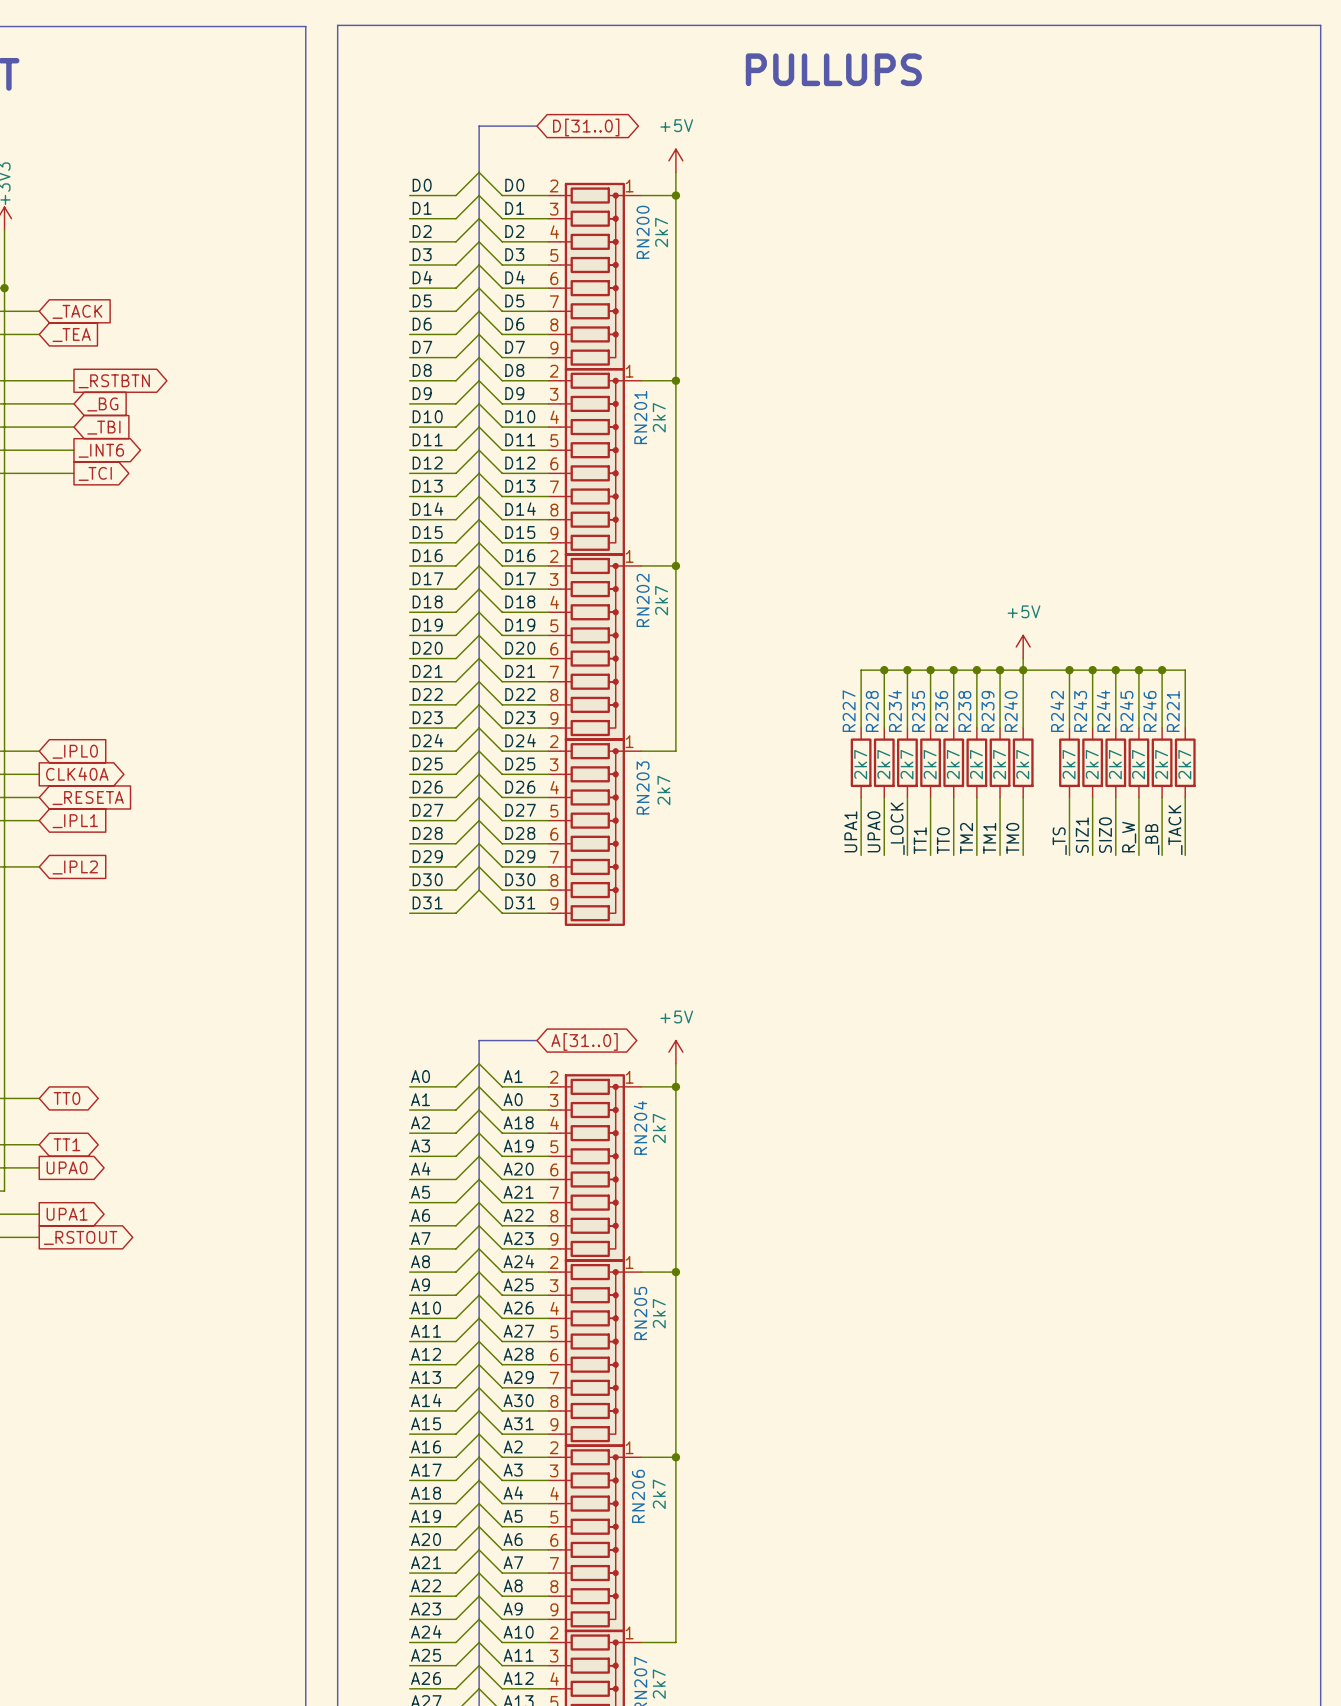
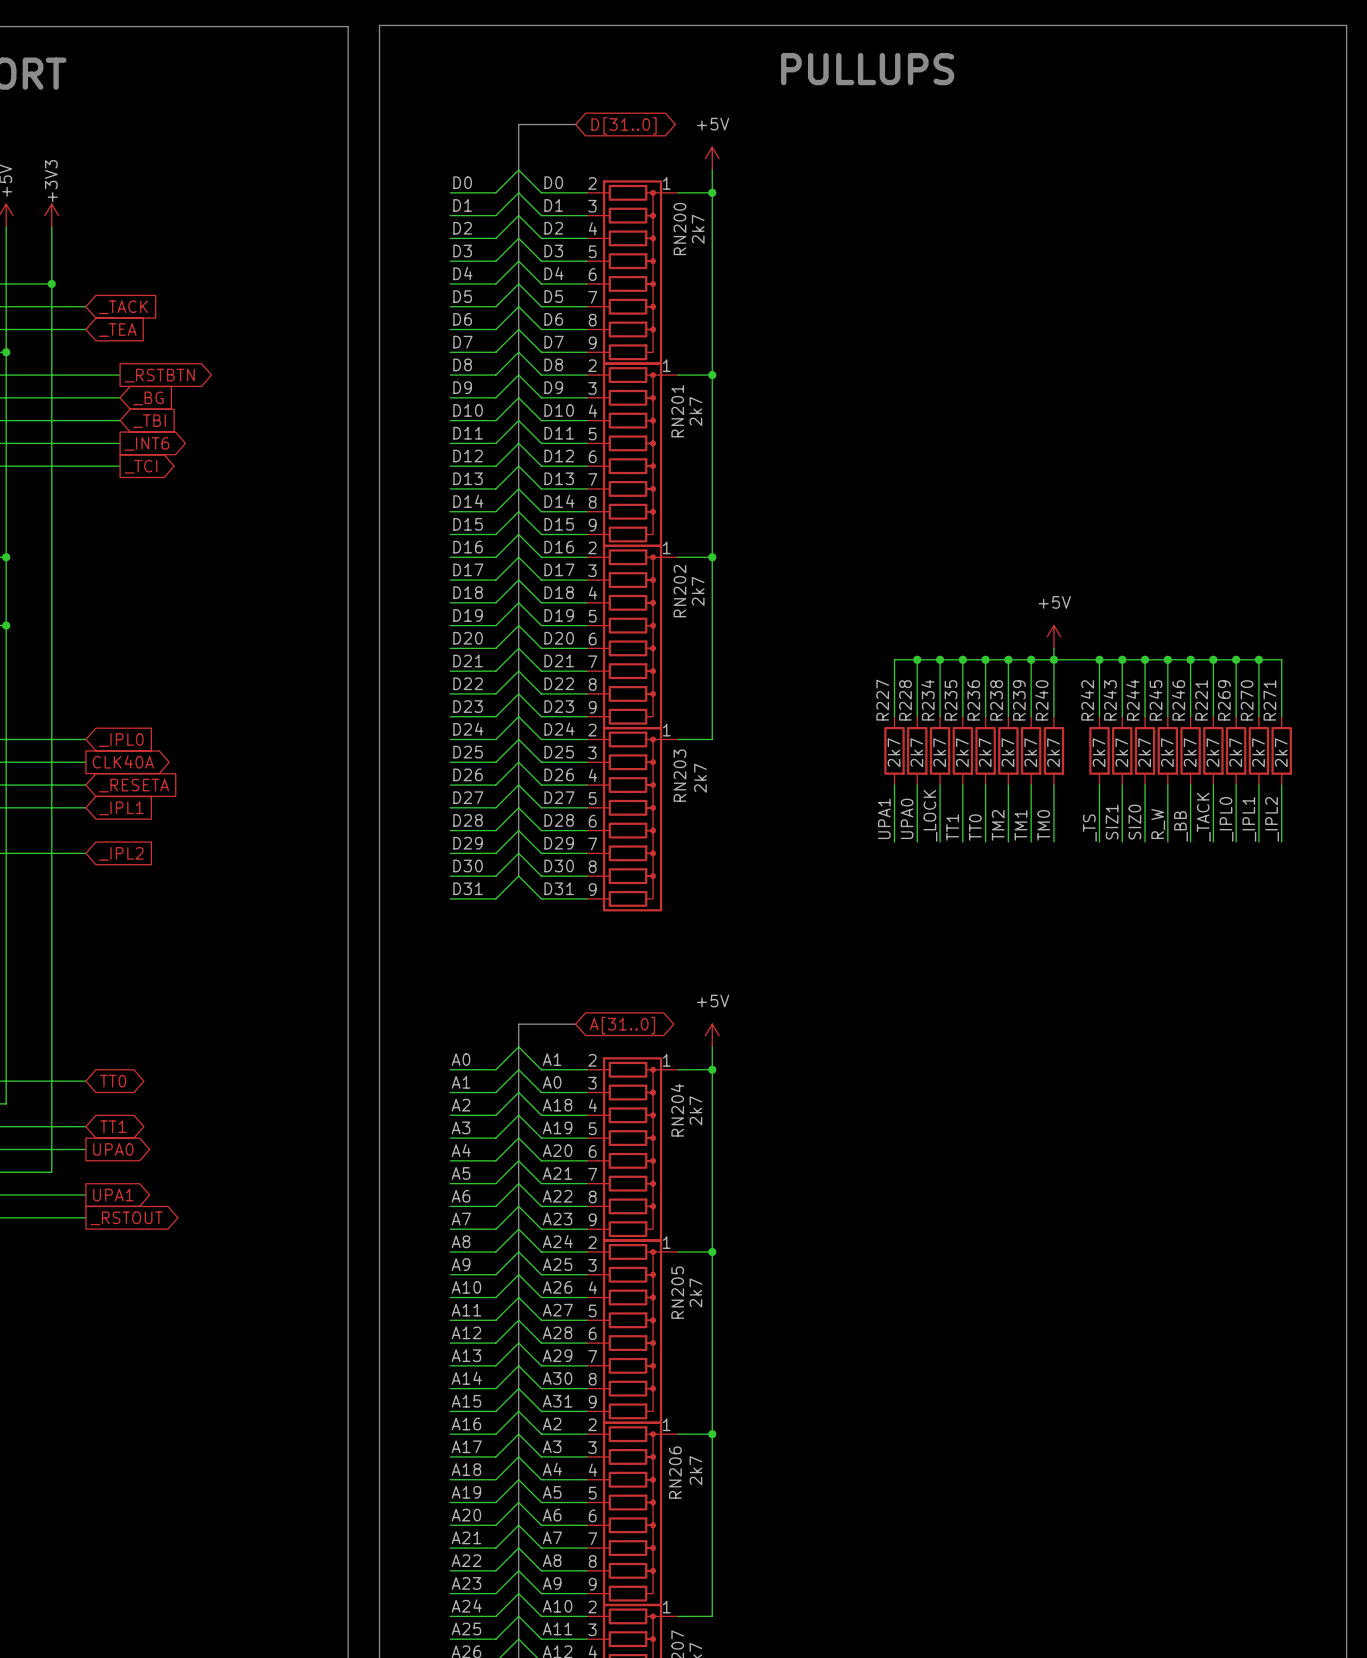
wire: none -> (1213, 659) (1281, 659) (1281, 716)
junction: none -> (1213, 659)
wire: none -> (1236, 659) (1236, 716)
junction: none -> (1236, 659)
wire: none -> (1258, 659) (1258, 716)
junction: none -> (1258, 659)
R269: none -> 2k7 (1236, 750)
R270: none -> 2k7 (1258, 750)
R271: none -> 2k7 (1281, 750)
wire: none -> (1236, 785) (1236, 841)
wire: none -> (1258, 785) (1258, 841)
wire: none -> (1281, 785) (1281, 841)
label: none -> _IPL0 (1226, 819)
label: none -> _IPL1 (1249, 819)
label: none -> _IPL2 (1272, 819)

